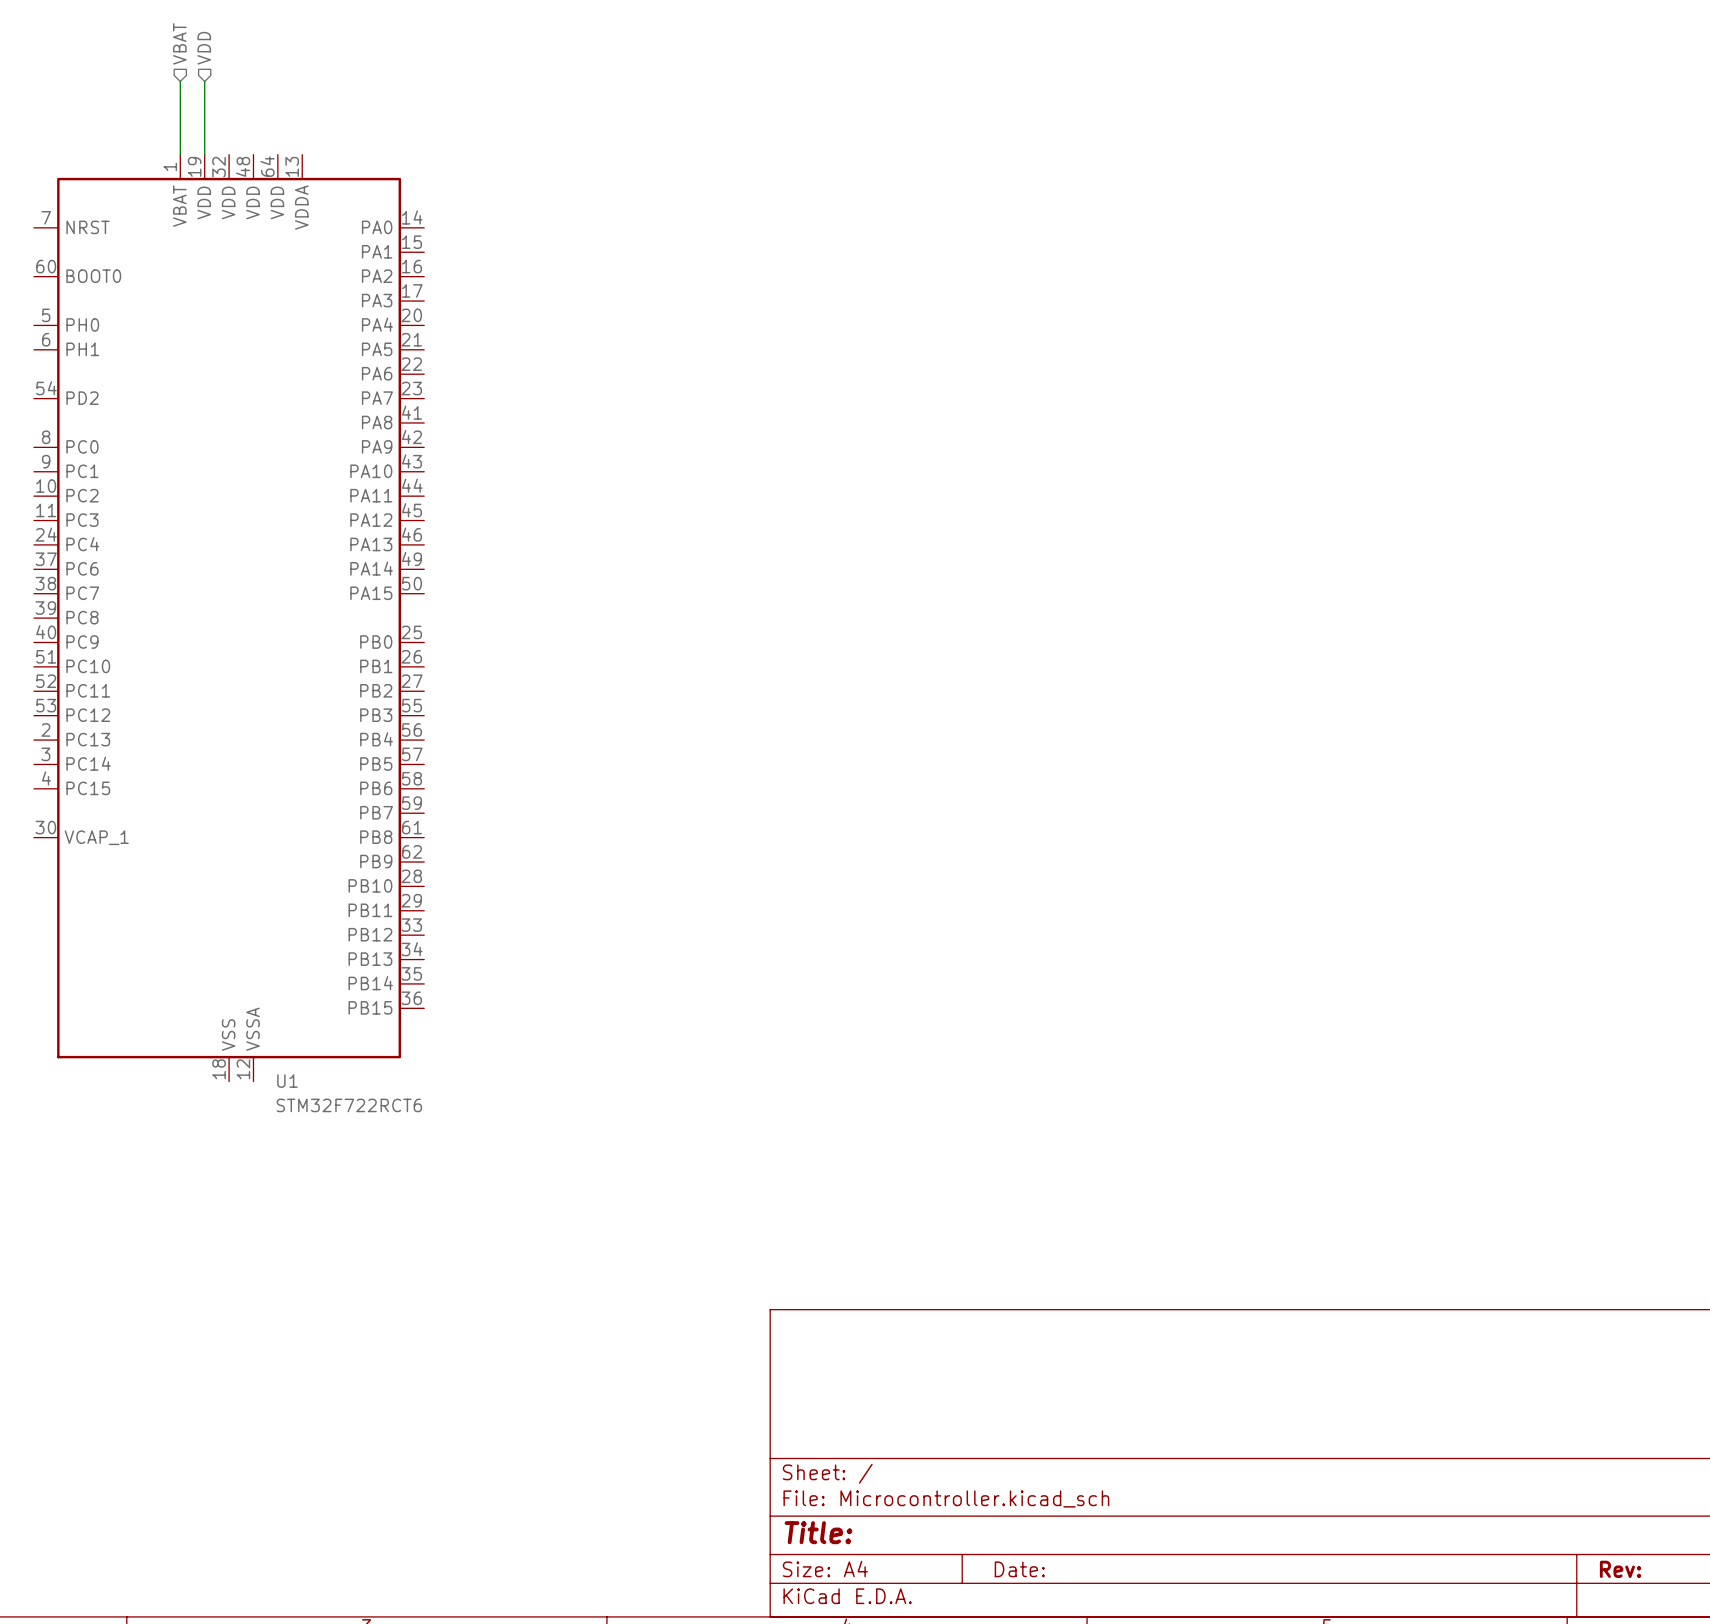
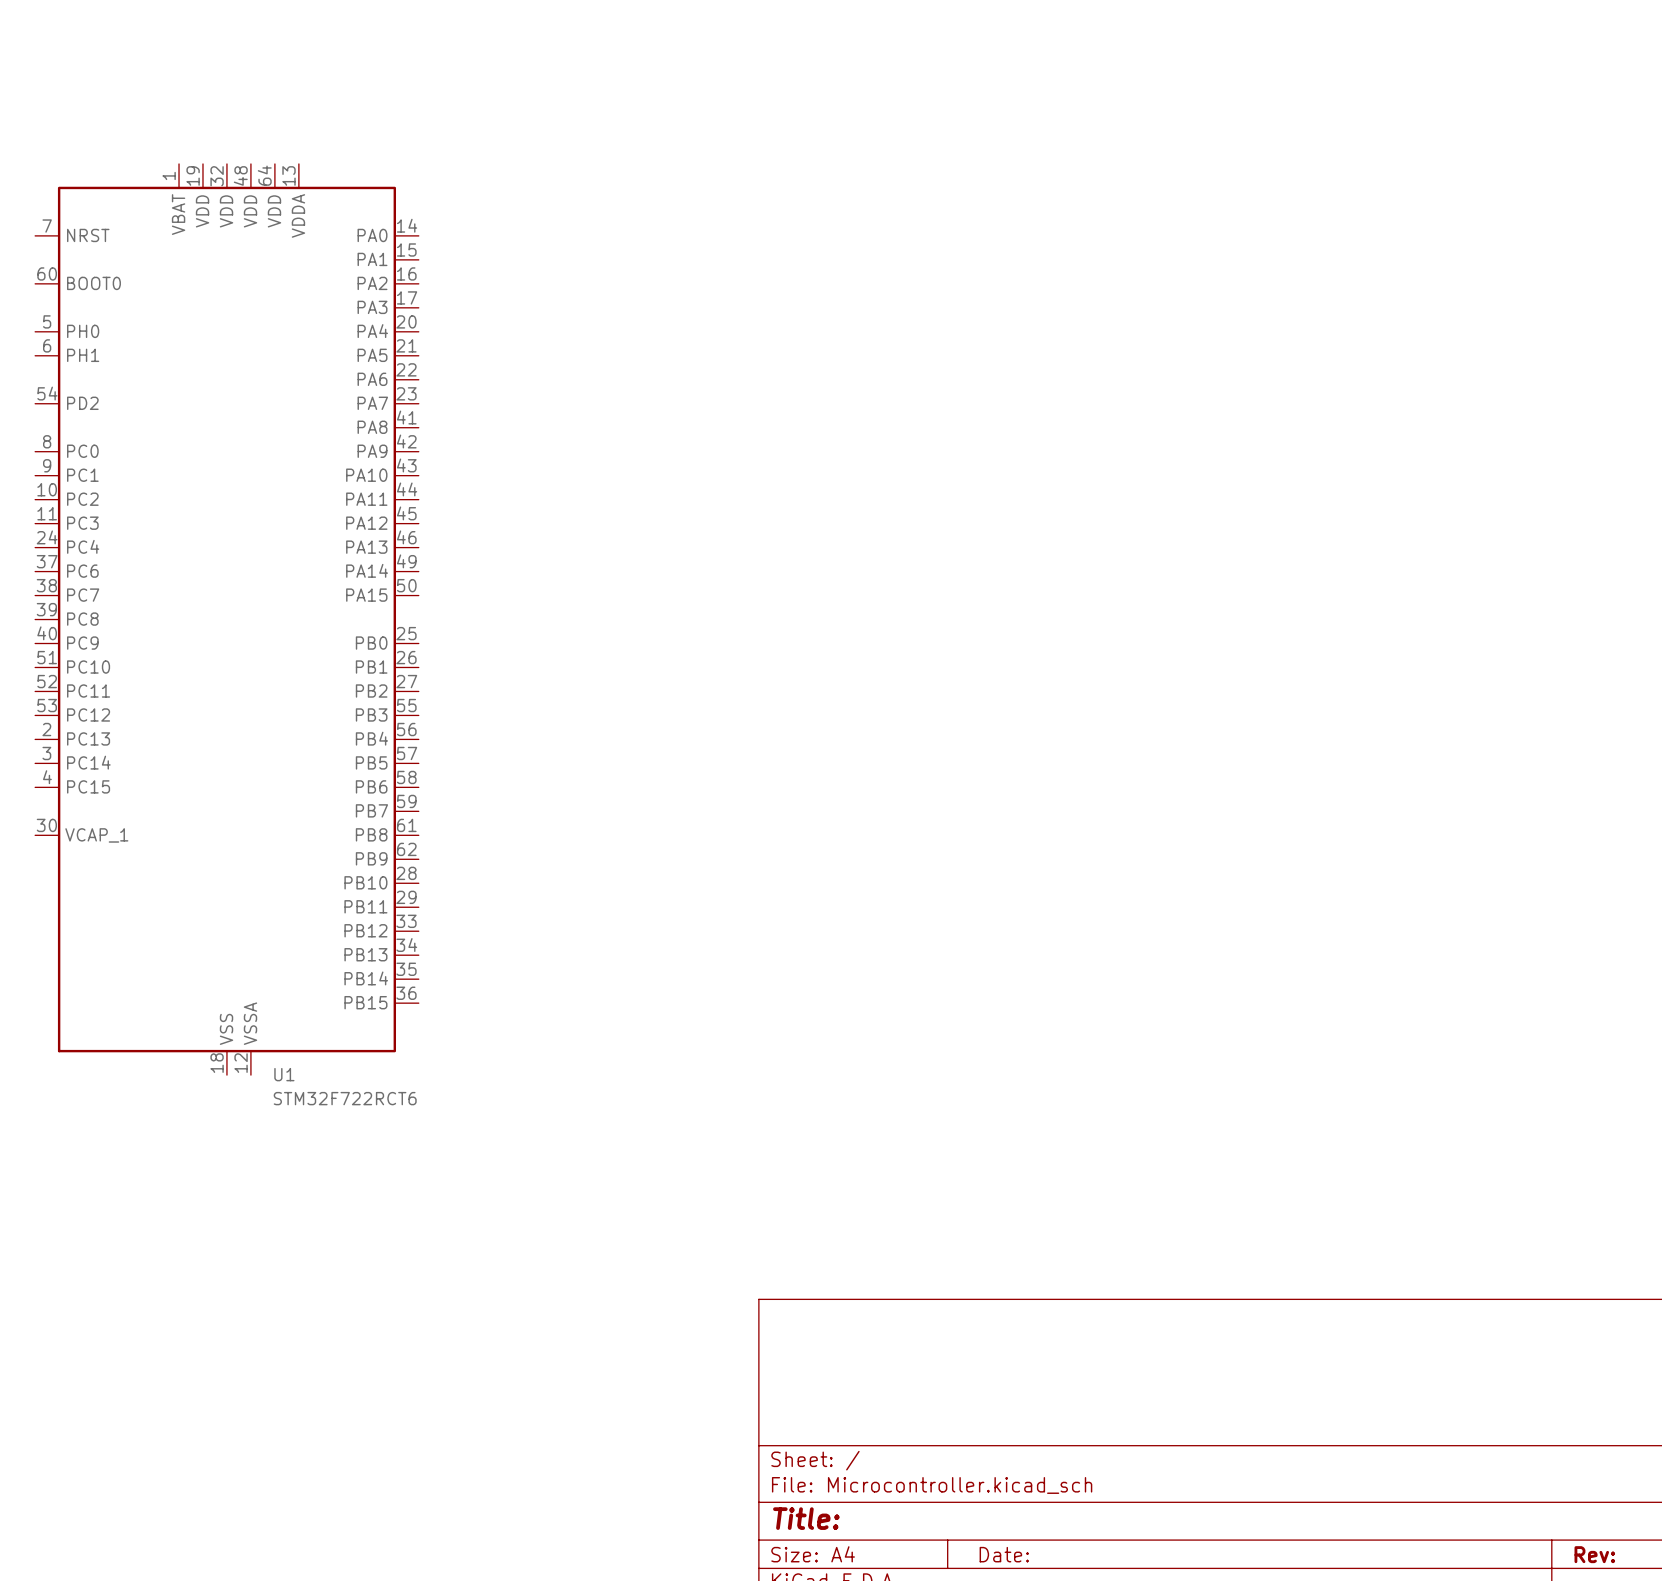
hierarchical label: VBAT (179, 43) -> none
hierarchical label: VDD (204, 48) -> none
wire: (180, 81) (180, 154) -> none
wire: (204, 81) (204, 154) -> none

